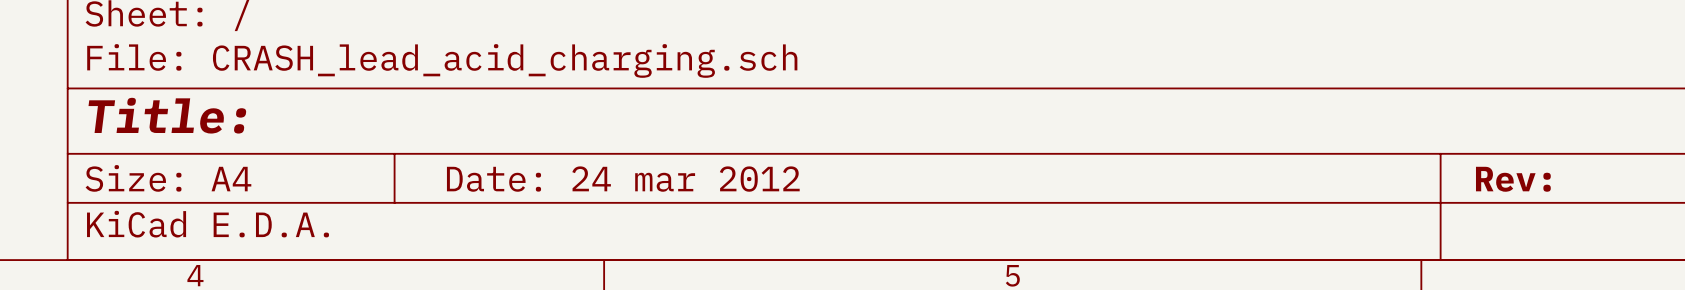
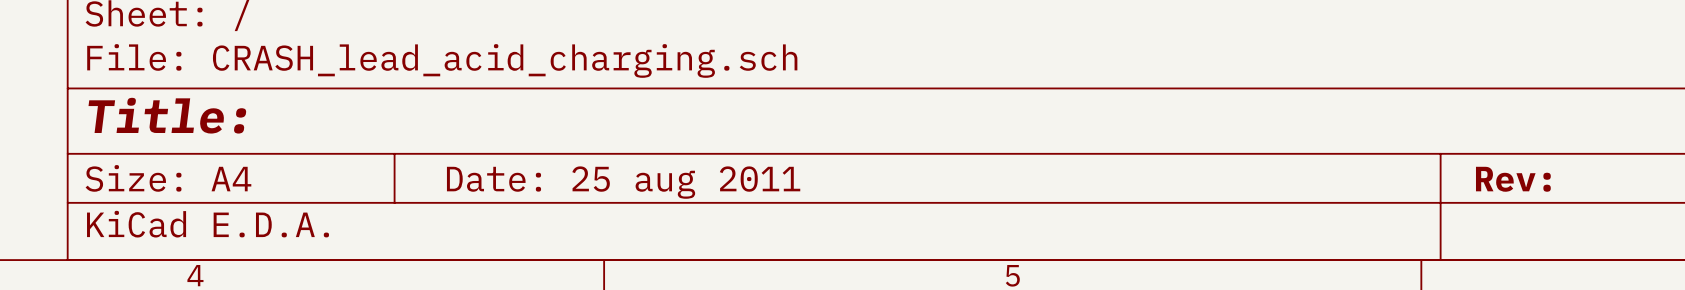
title block: Date: 24 mar 2012 (623, 179) -> Date: 25 aug 2011 (623, 182)

